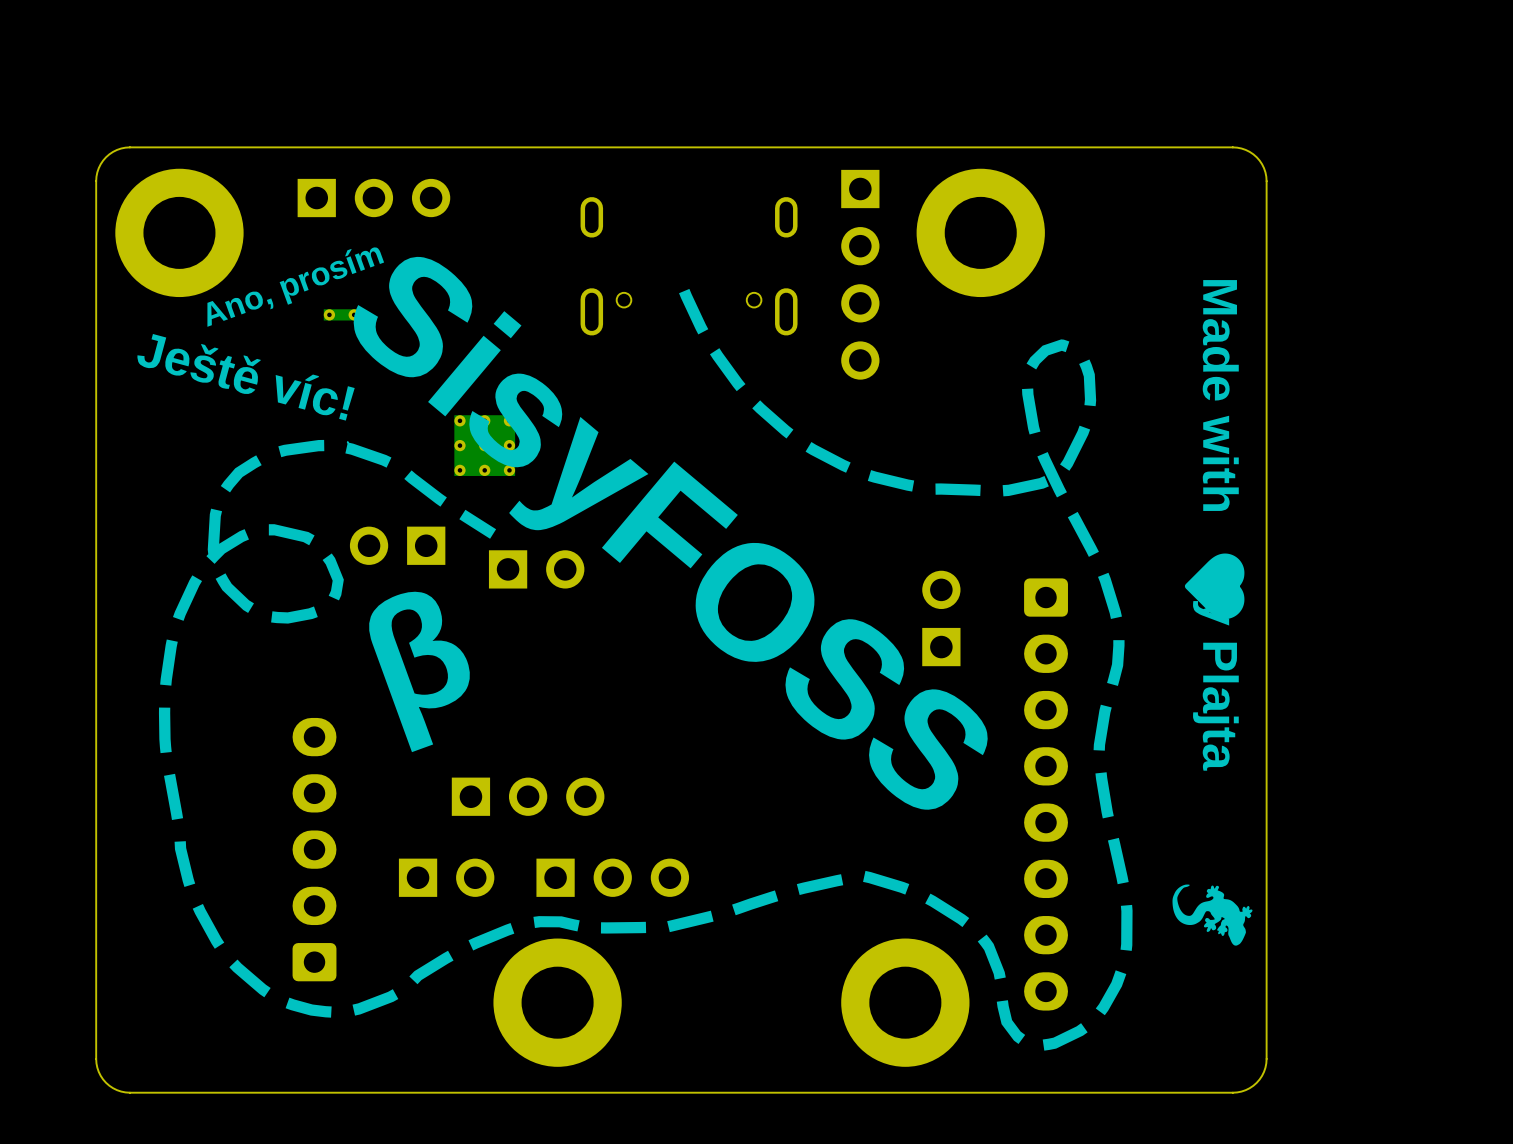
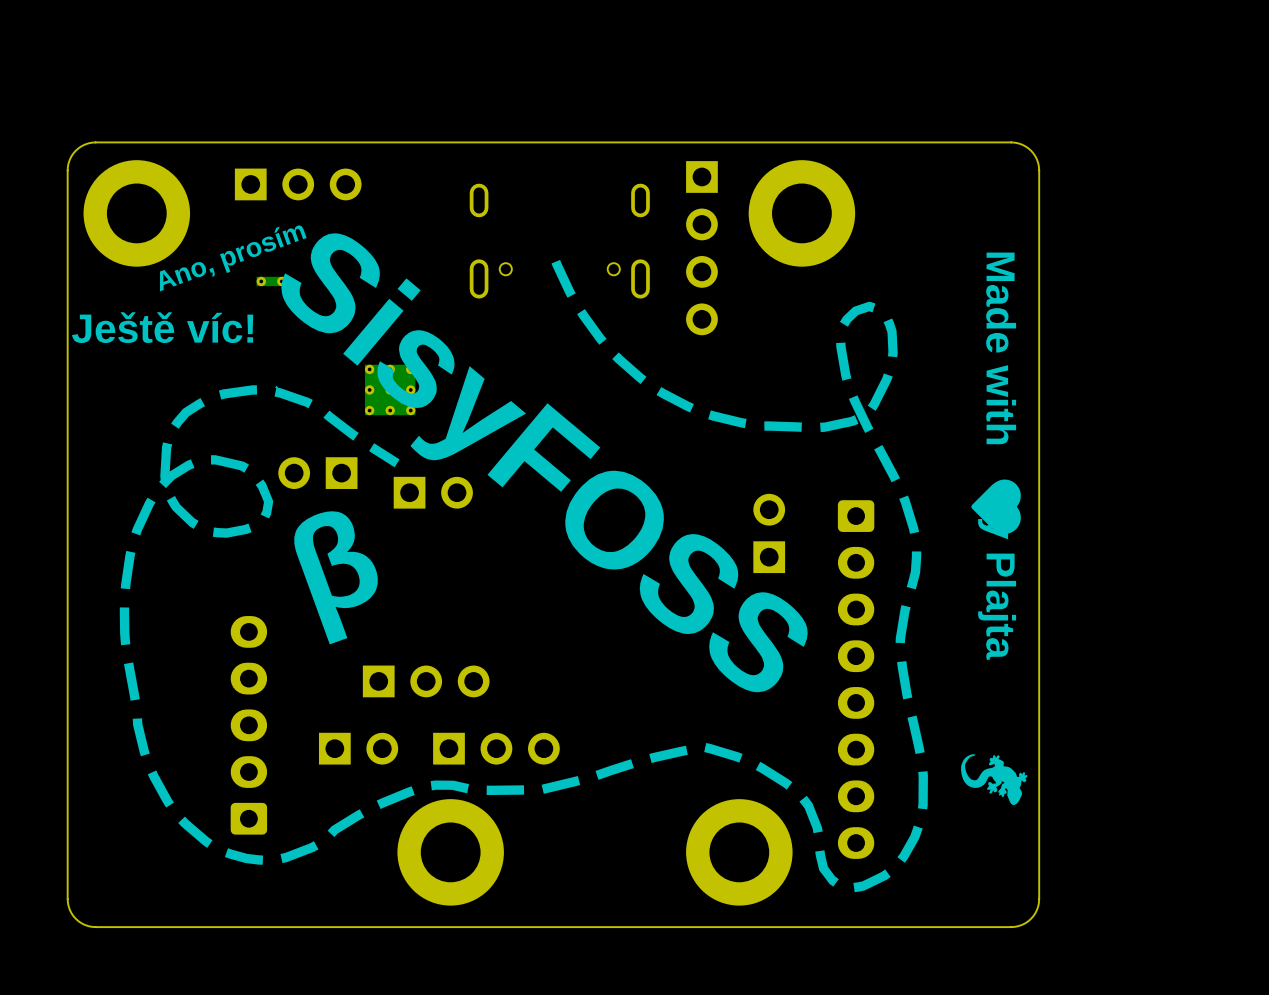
text rotation: 0° (245, 377) -> 15° counterclockwise (162, 327)

